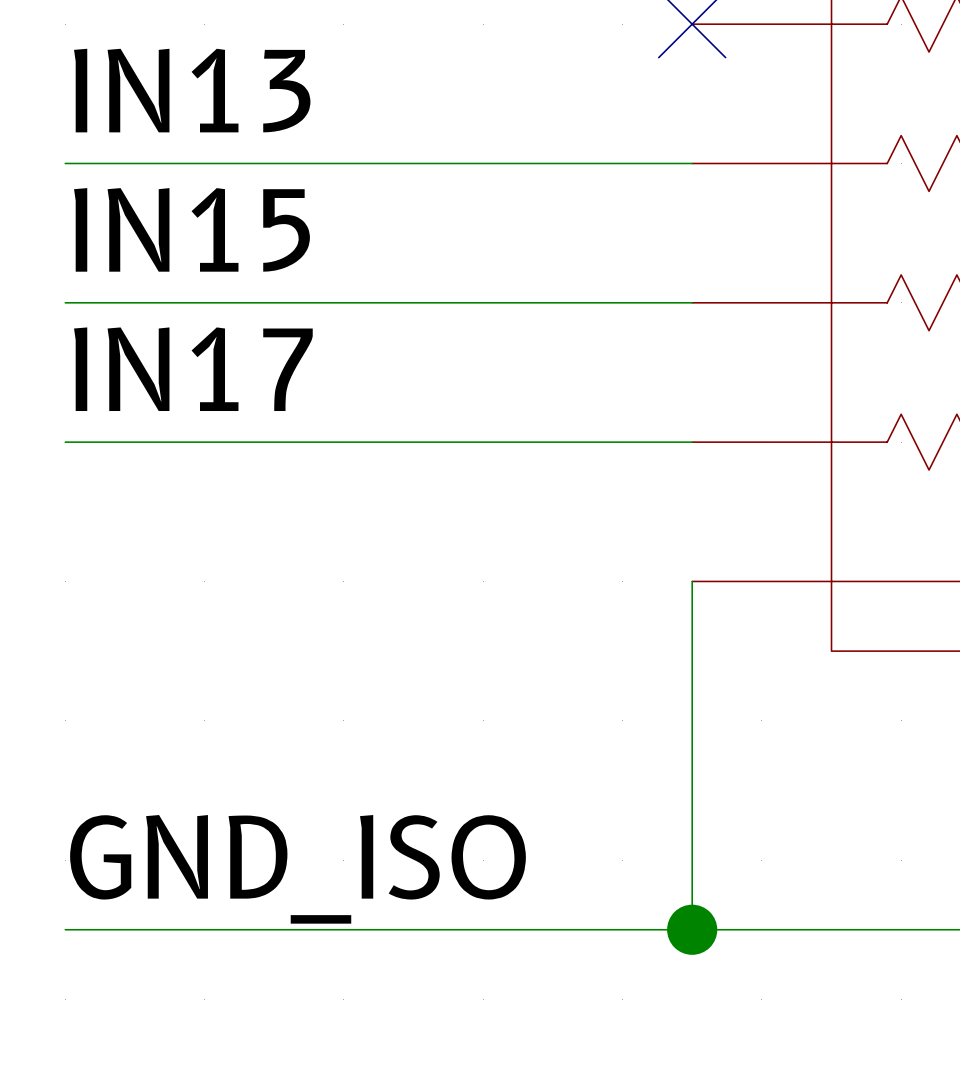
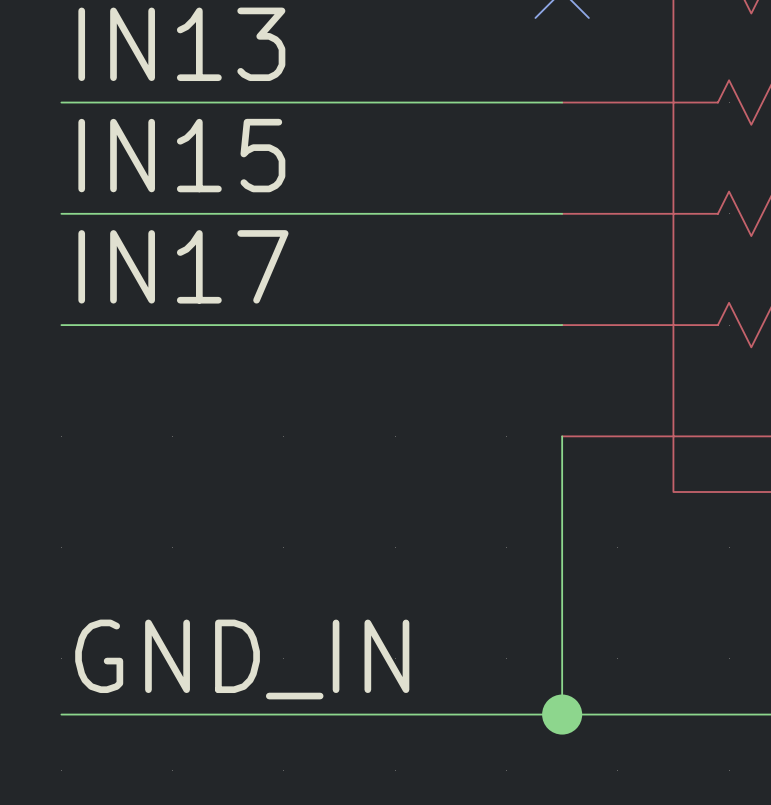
label: GND_ISO (297, 869) -> GND_IN (242, 659)

